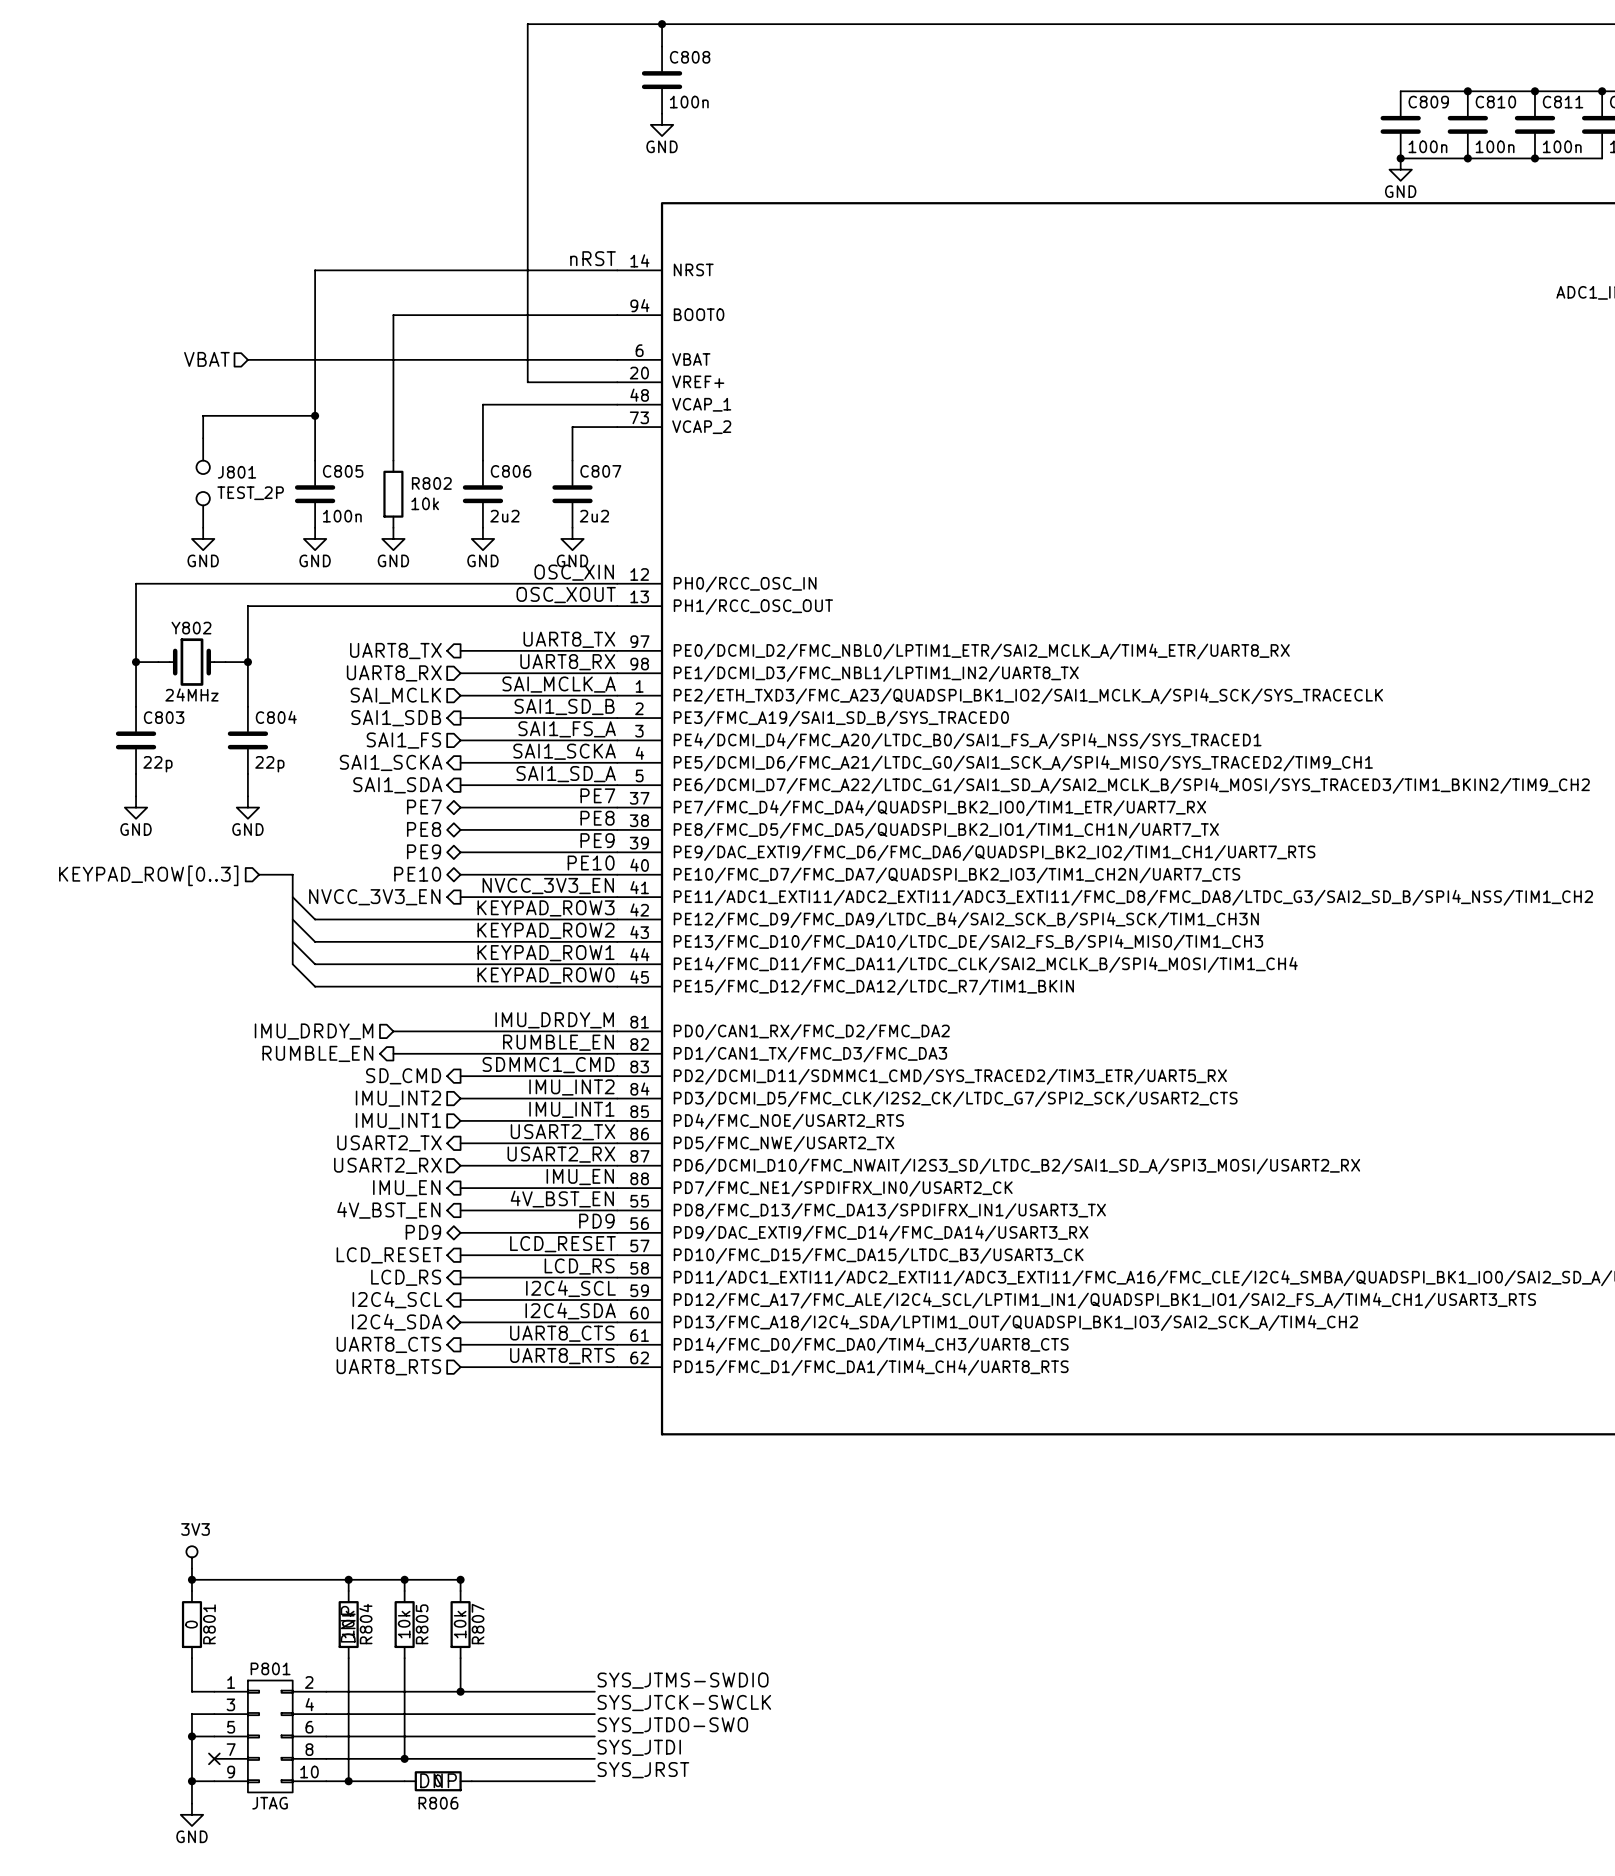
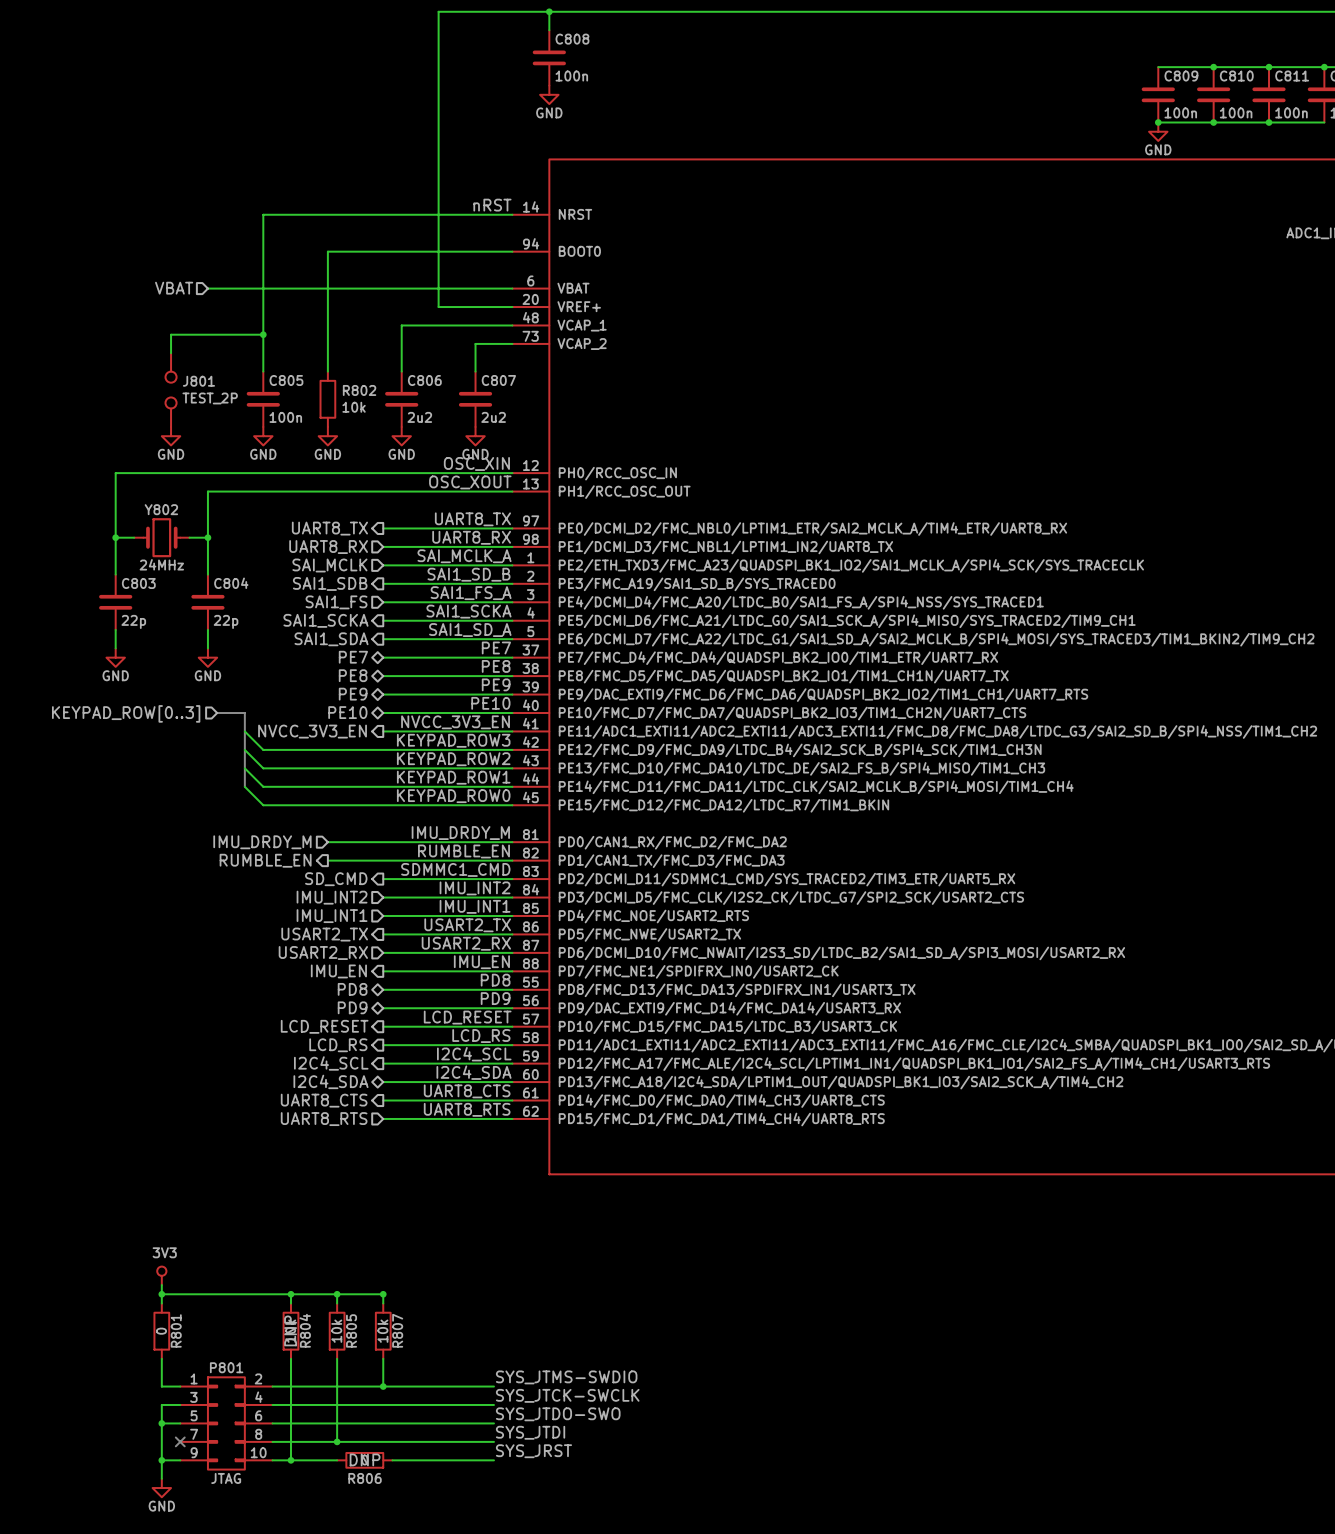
label: 4V_BST_EN (562, 1199) -> PD8 (495, 980)
hierarchical label shape: output (388, 1210) -> bidirectional (352, 989)
hierarchical label: 4V_BST_EN (388, 1210) -> PD8 (352, 989)

